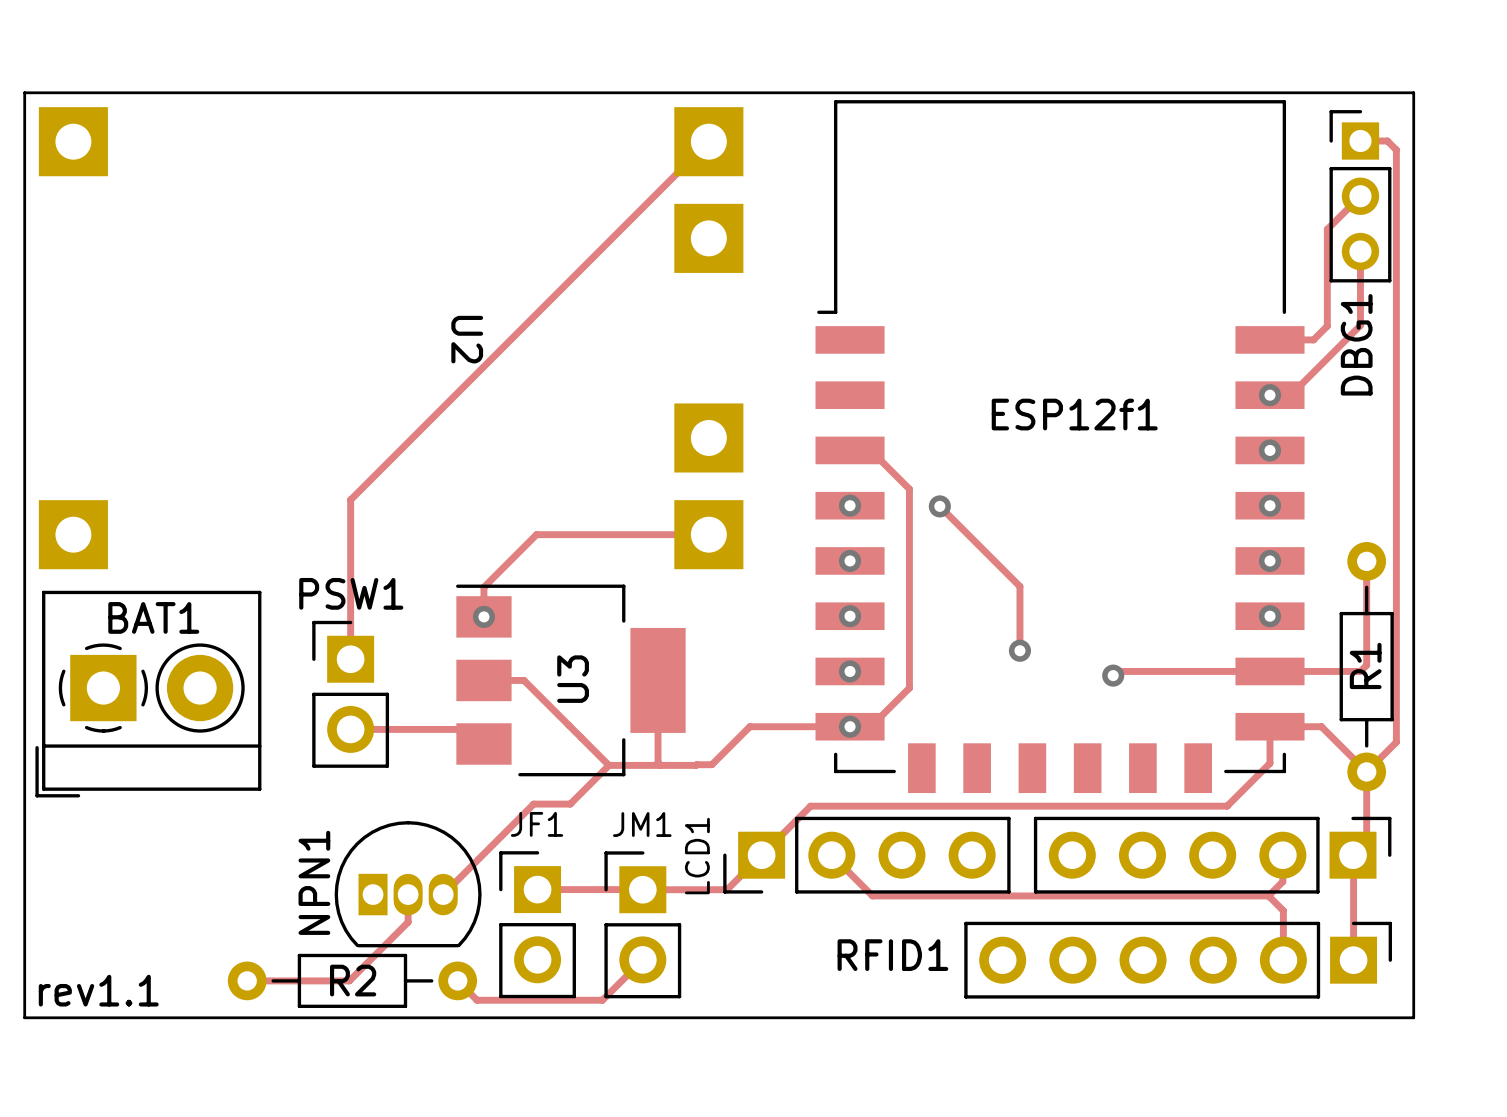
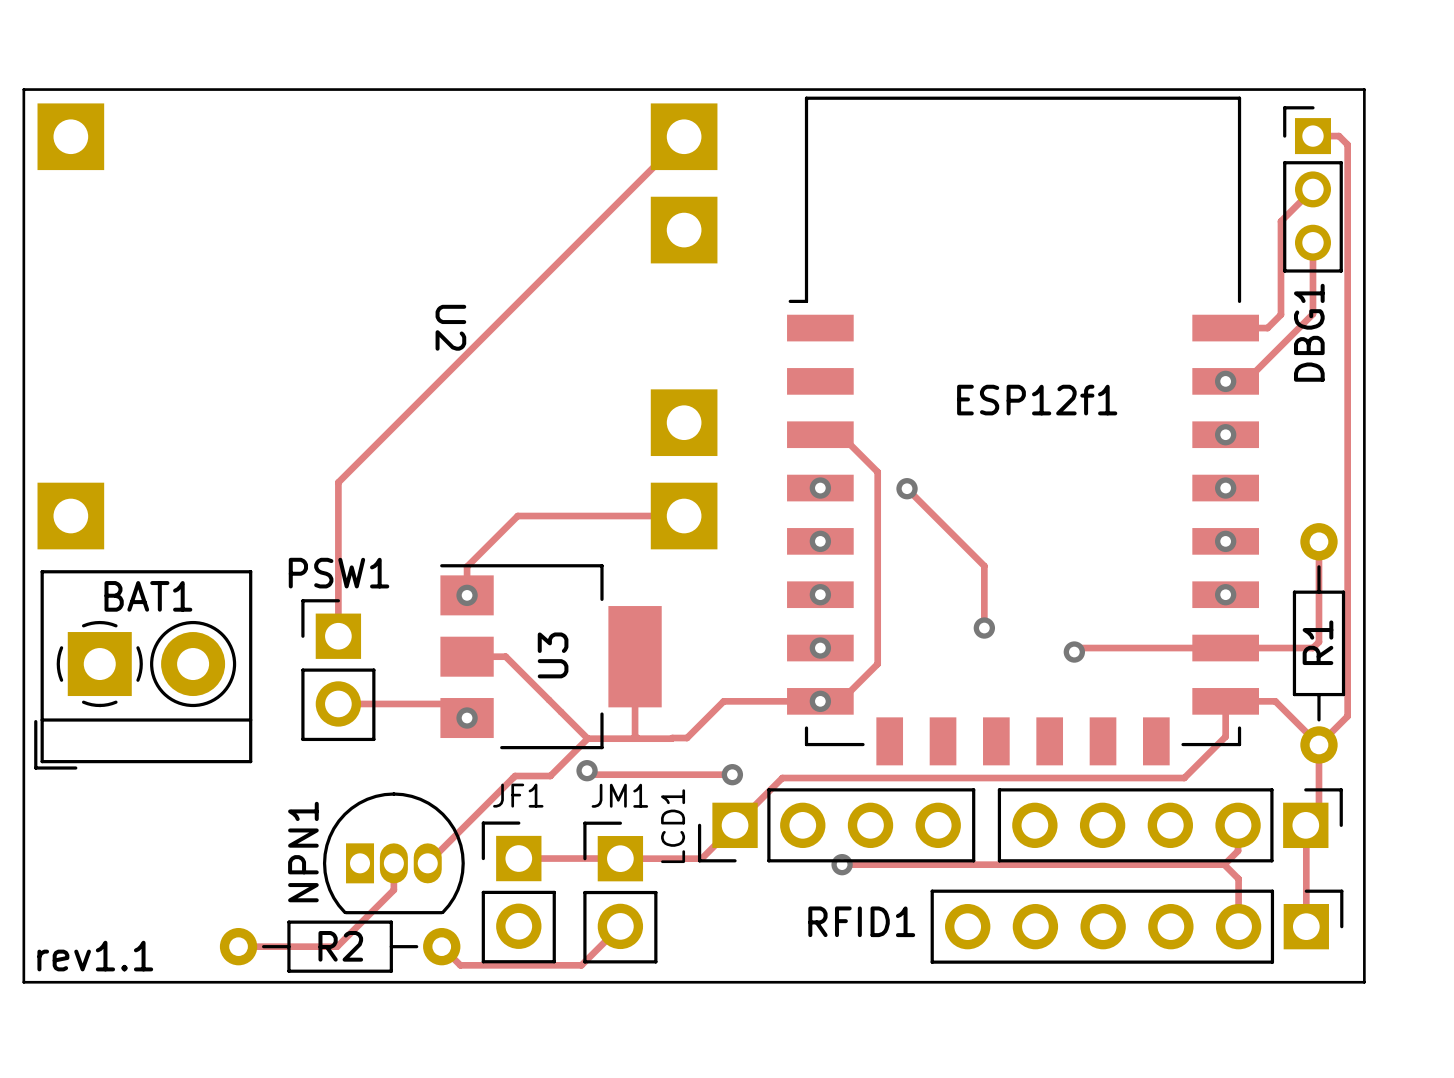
via: none -> (467, 718)
track: none -> (587, 770) (591, 774) (732, 774)
via: none -> (587, 770)
via: none -> (732, 774)
track: (831, 855) (872, 895) -> none
via: none -> (842, 864)

